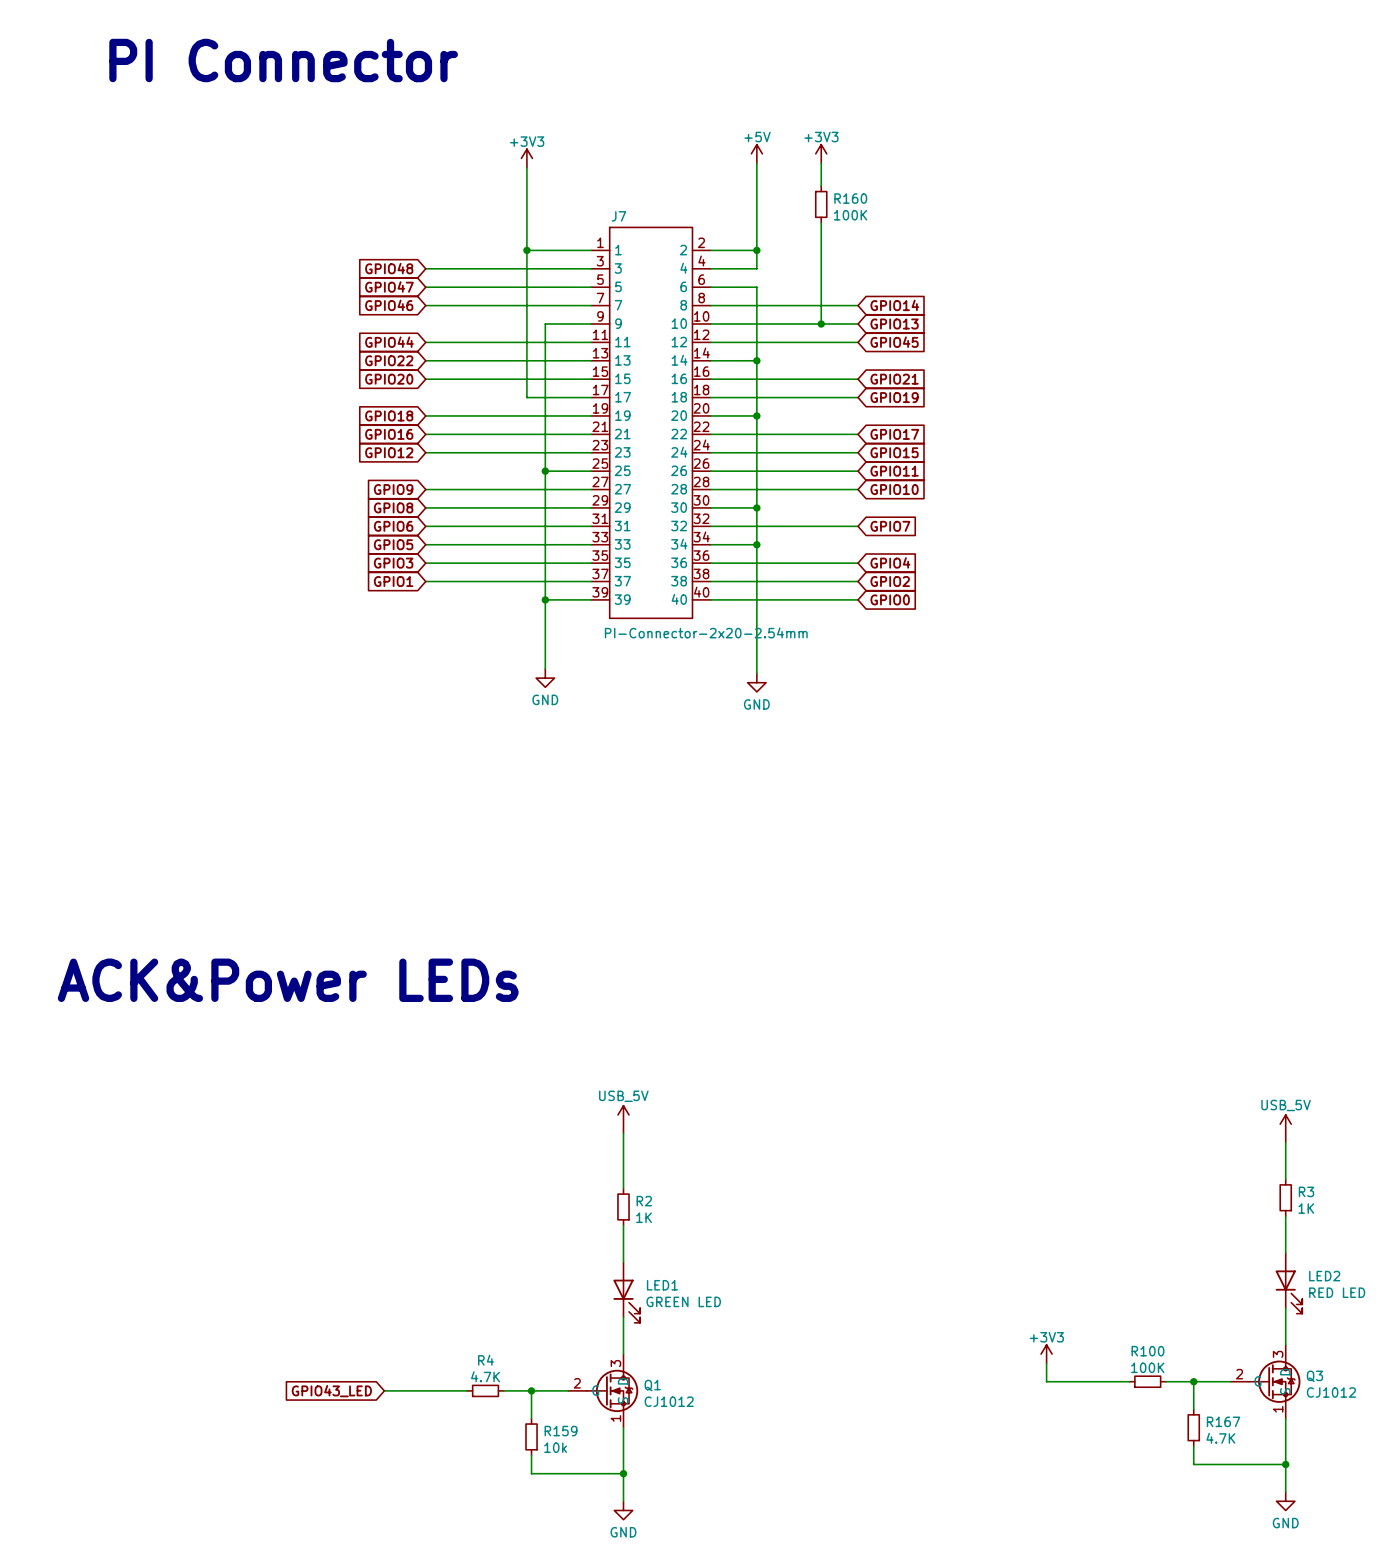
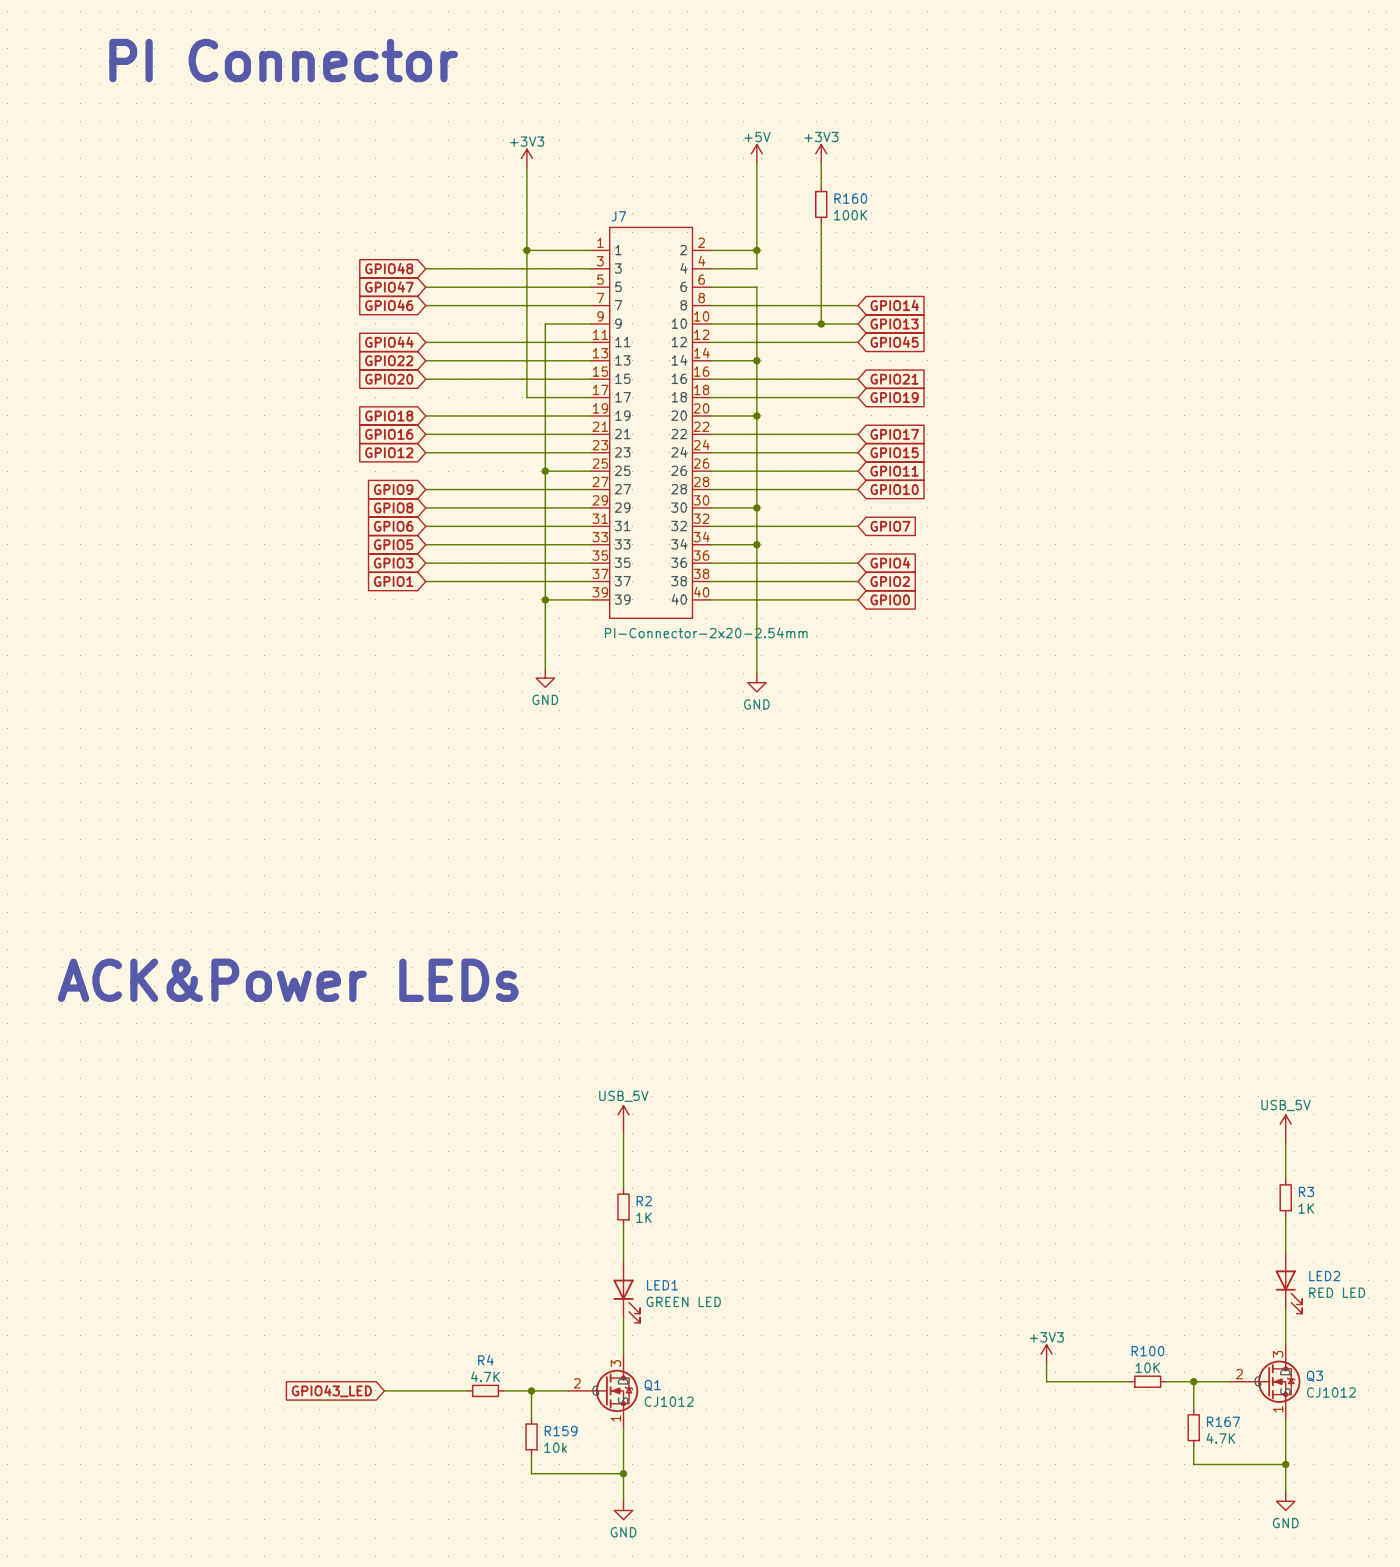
R100 value: 100K (1147, 1367) -> 10K (1147, 1367)

